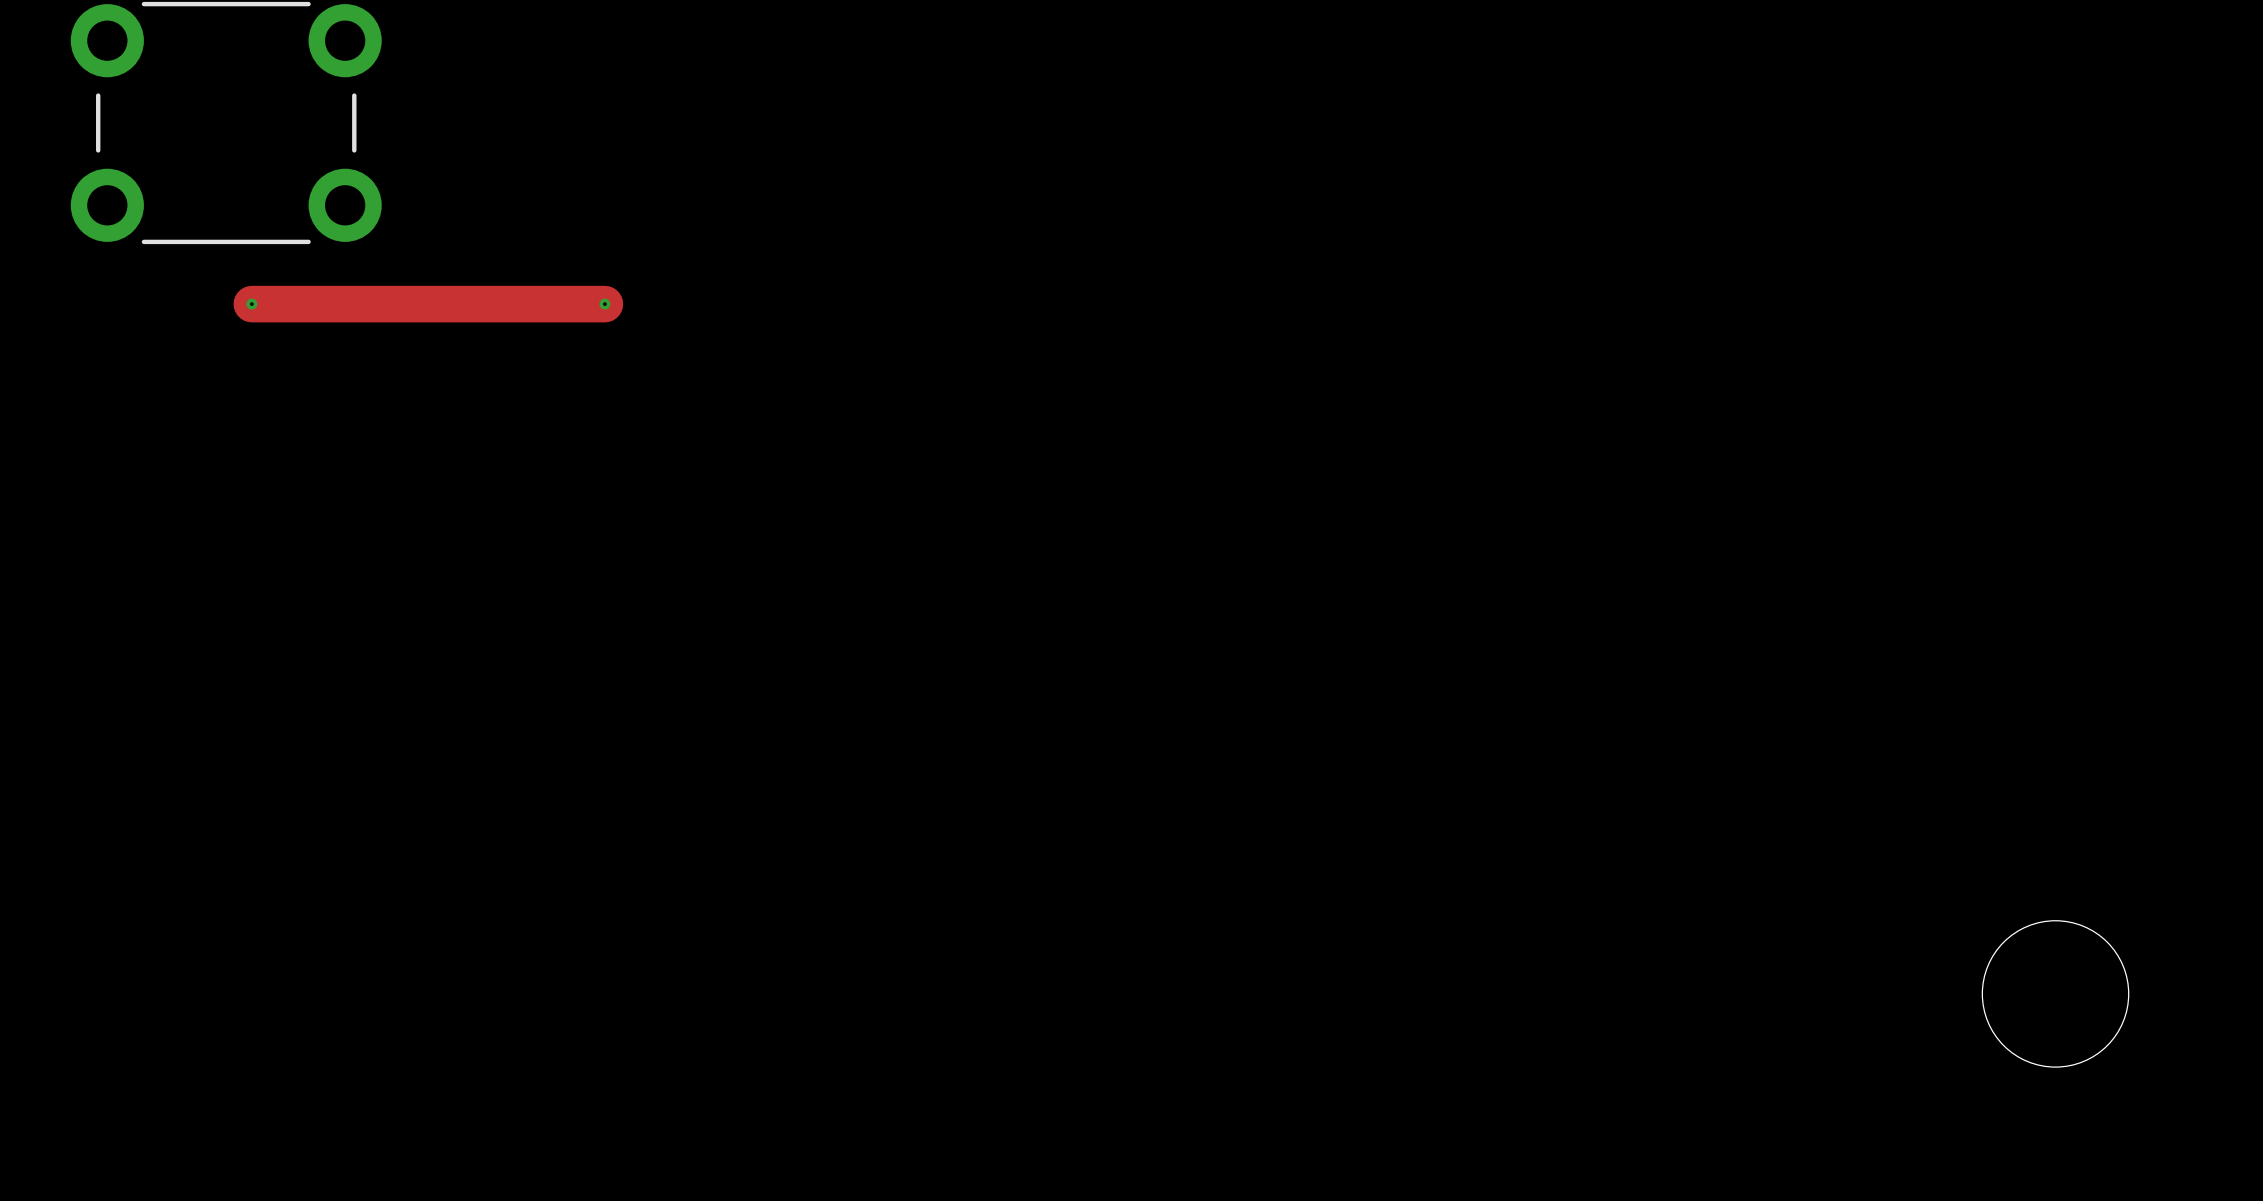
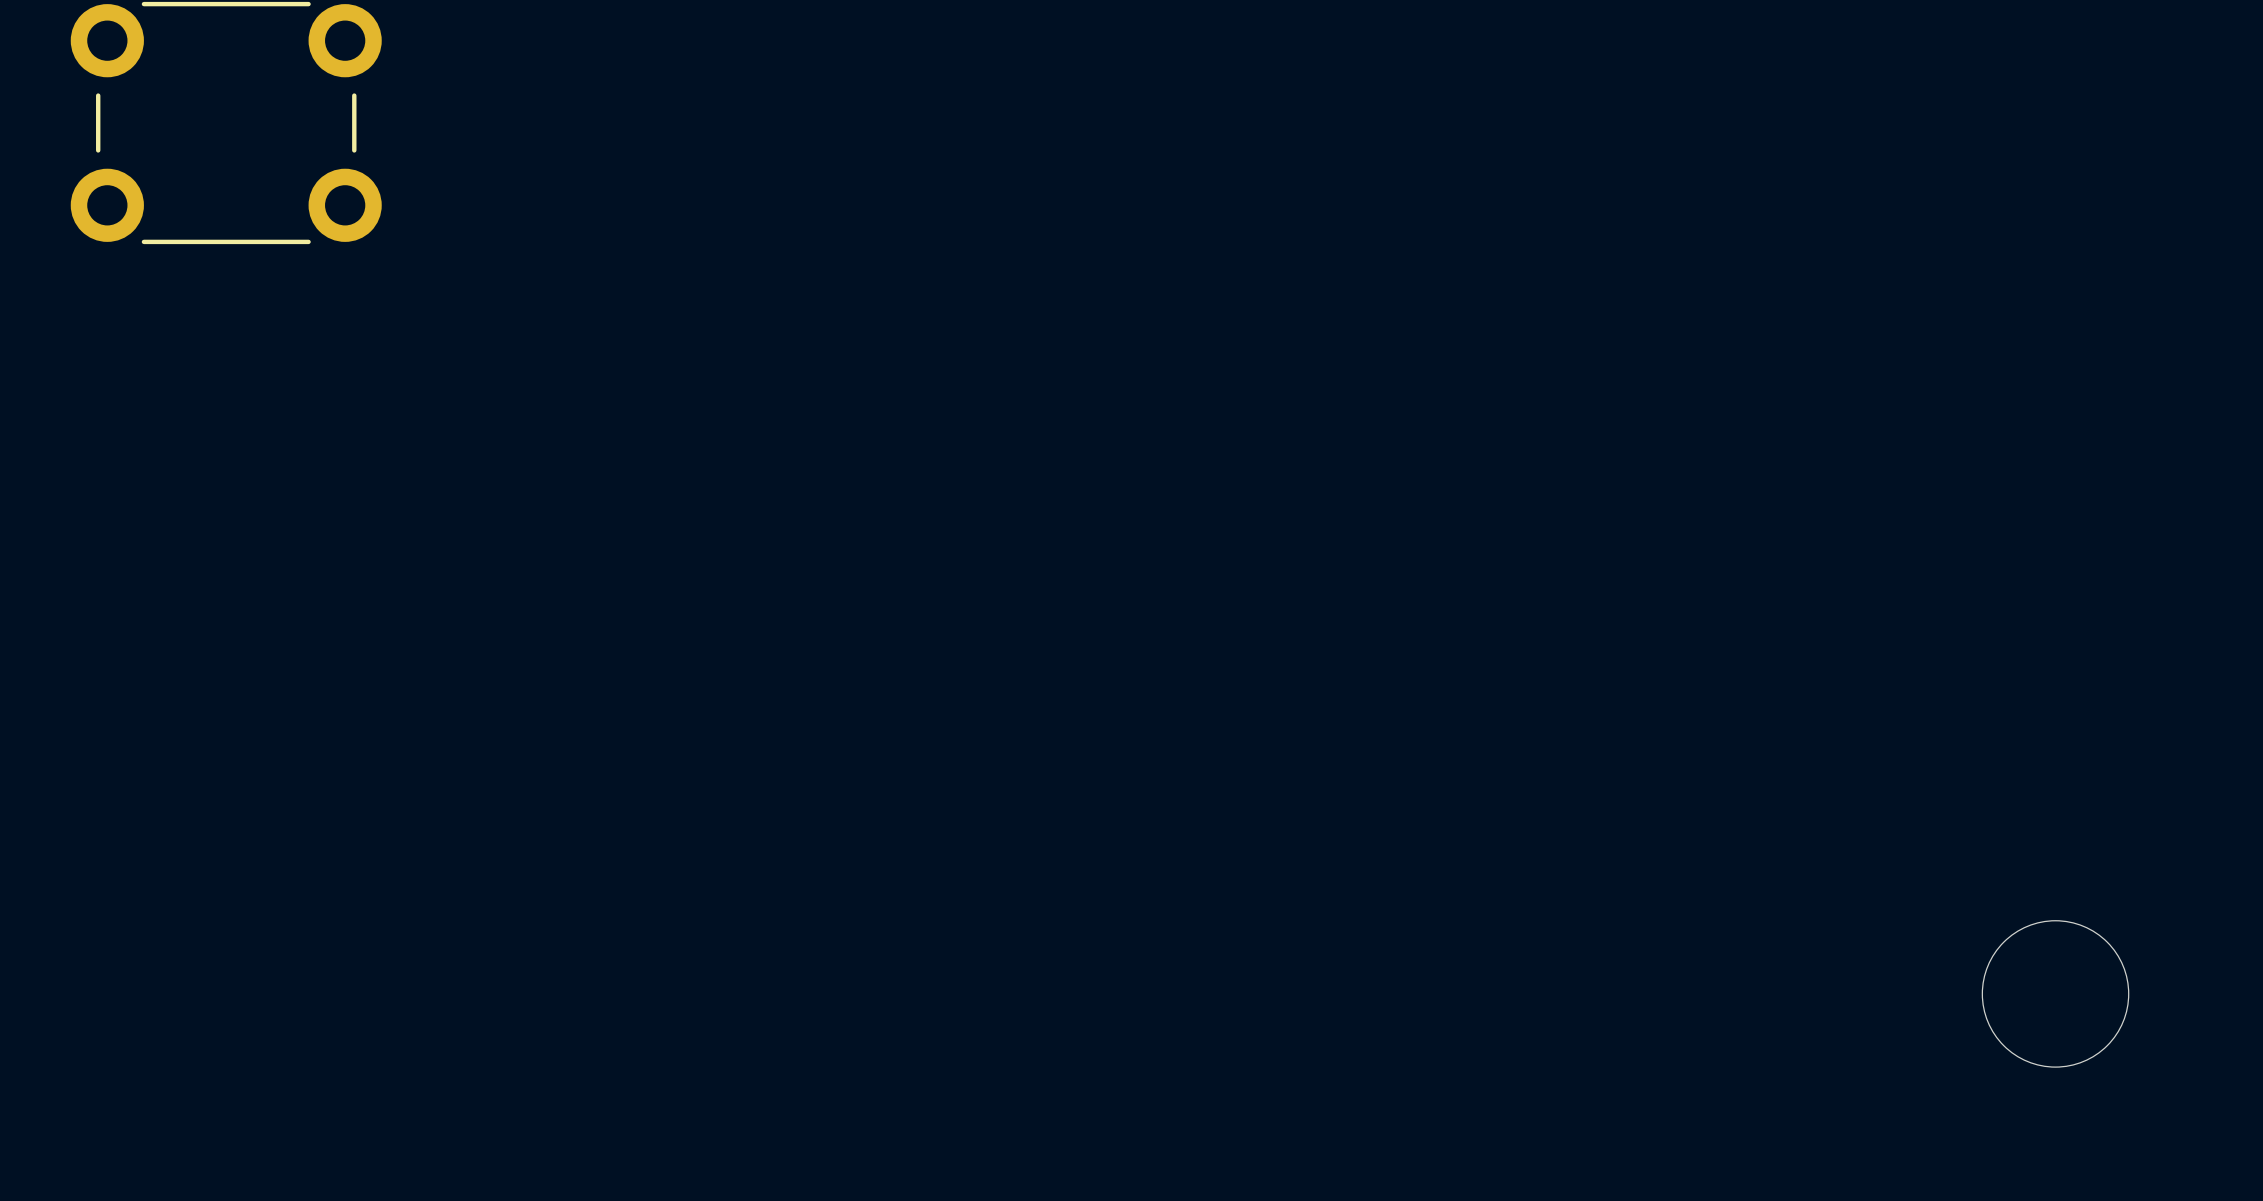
track: (251, 304) (604, 304) -> none
via: (251, 304) -> none
via: (604, 304) -> none

